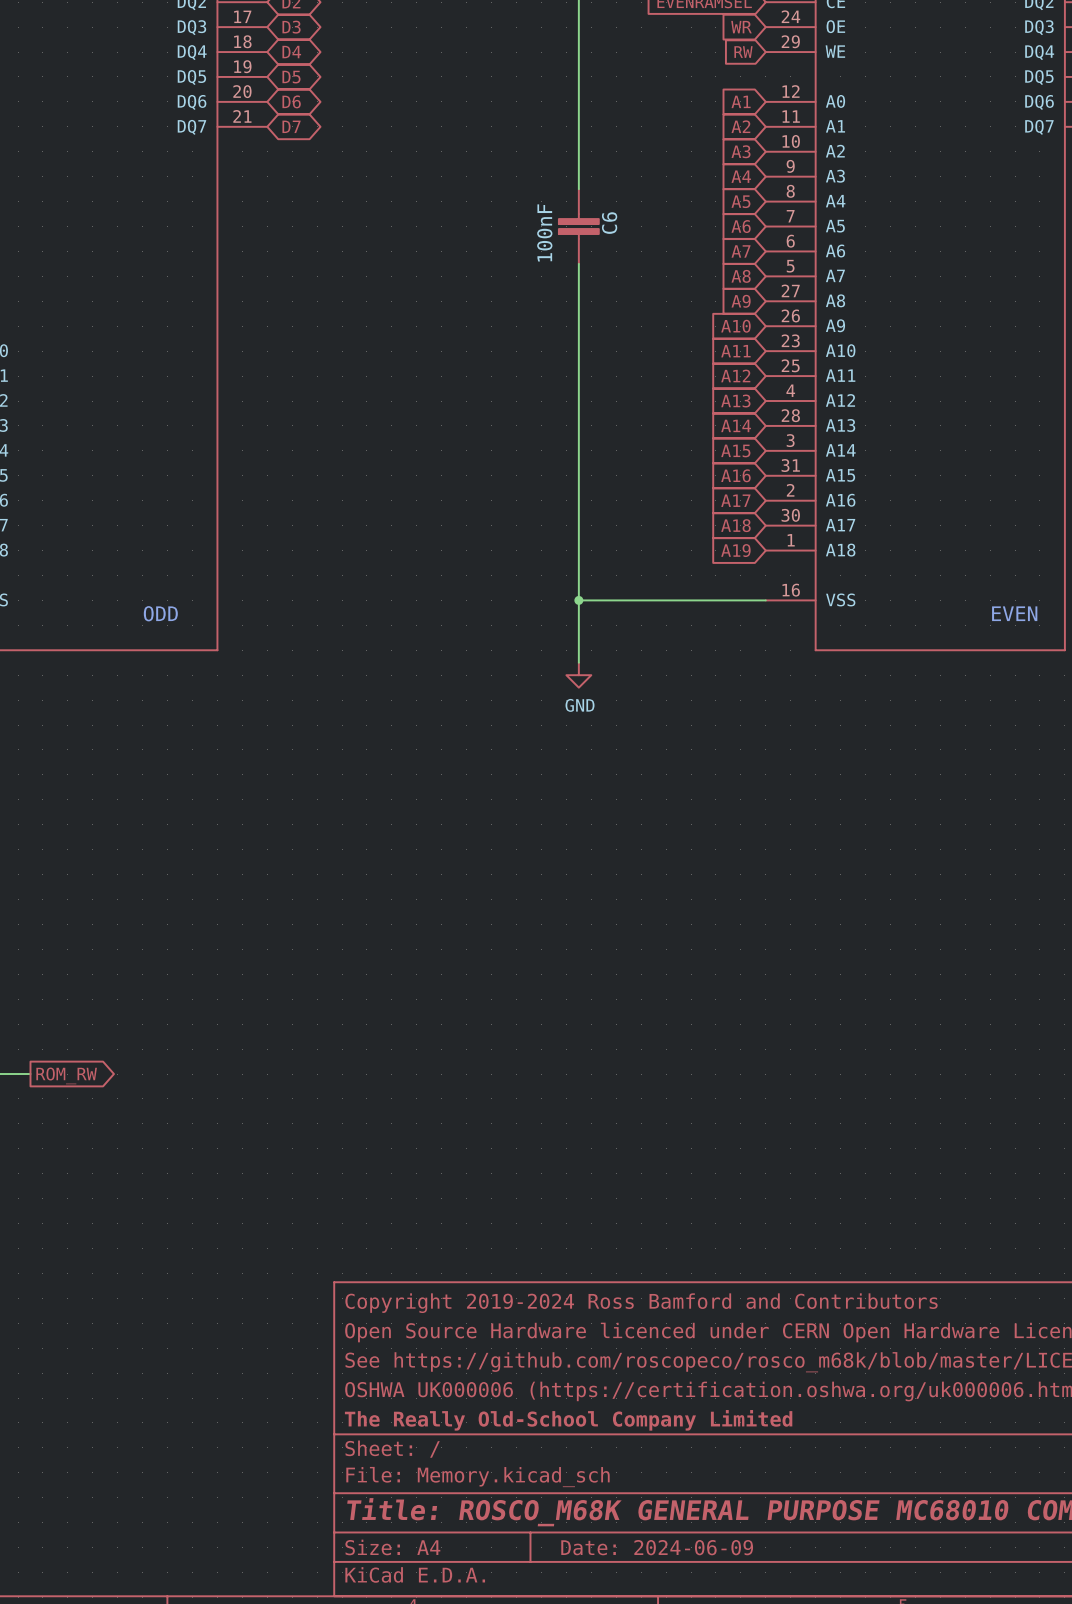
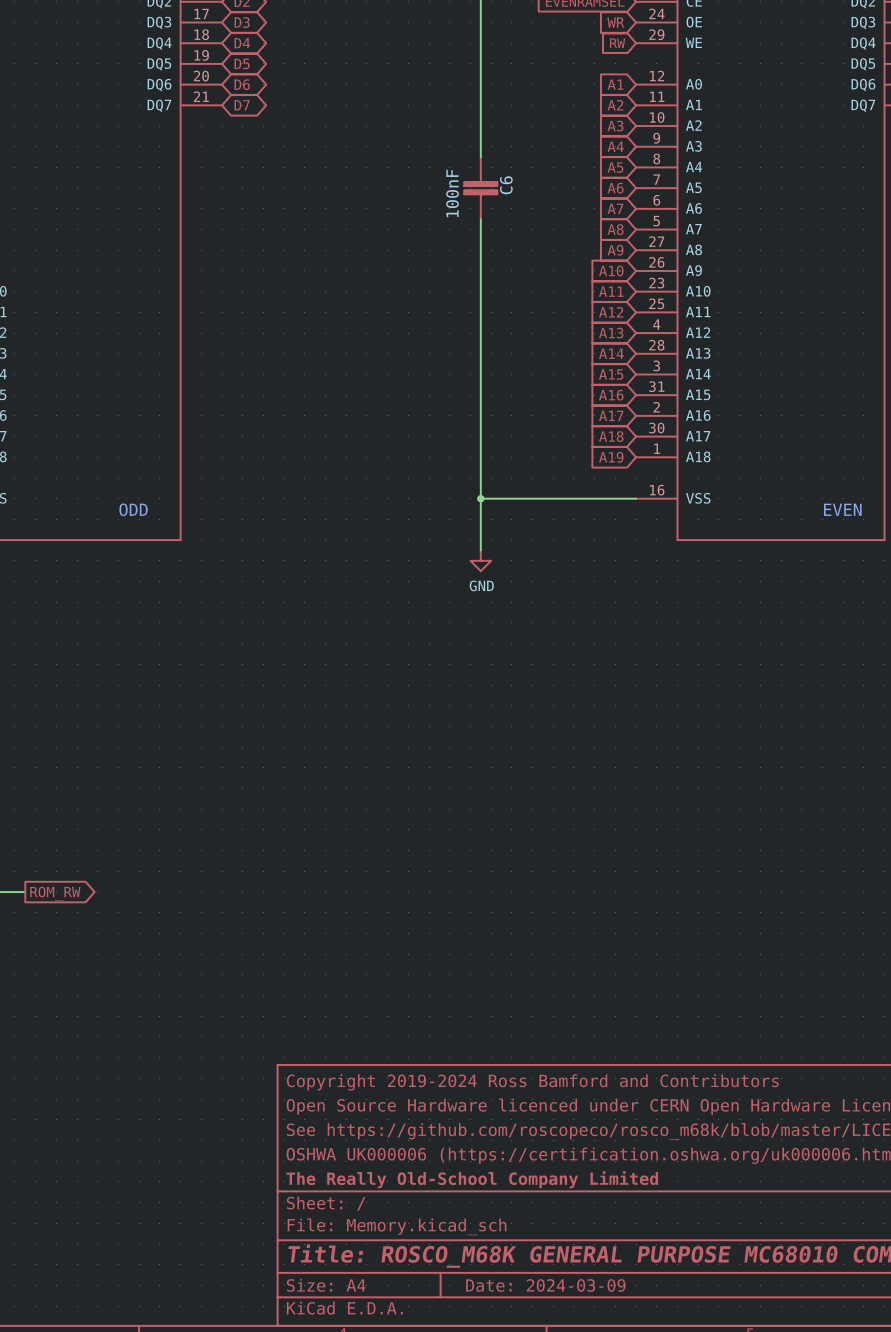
title block: Date: 2024-06-09 (657, 1547) -> Date: 2024-03-09 (545, 1285)

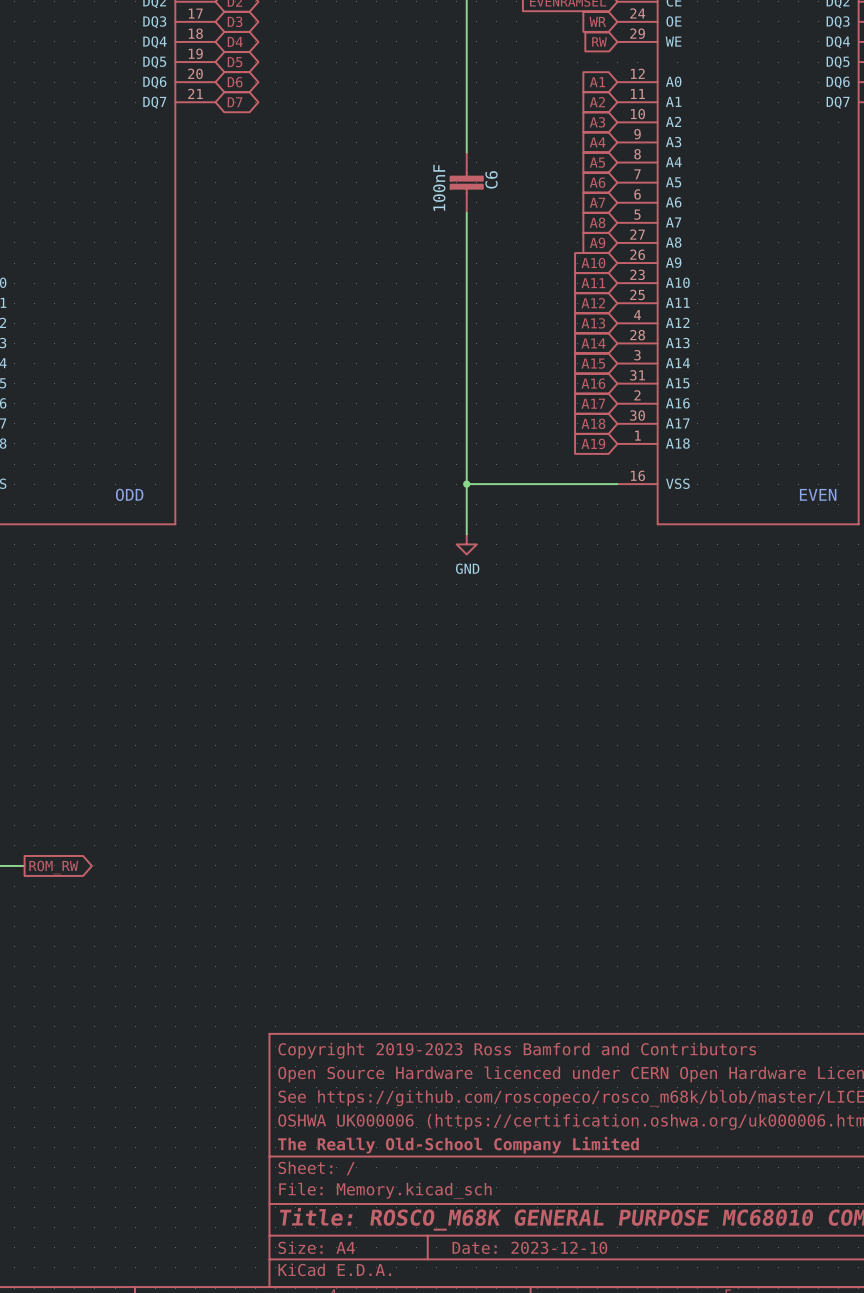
title block: Copyright 2019-2024 Ross Bamford and Contributors (532, 1082) -> Copyright 2019-2023 Ross Bamford and Contributors (517, 1050)
title block: Date: 2024-03-09 (545, 1285) -> Date: 2023-12-10 (529, 1247)

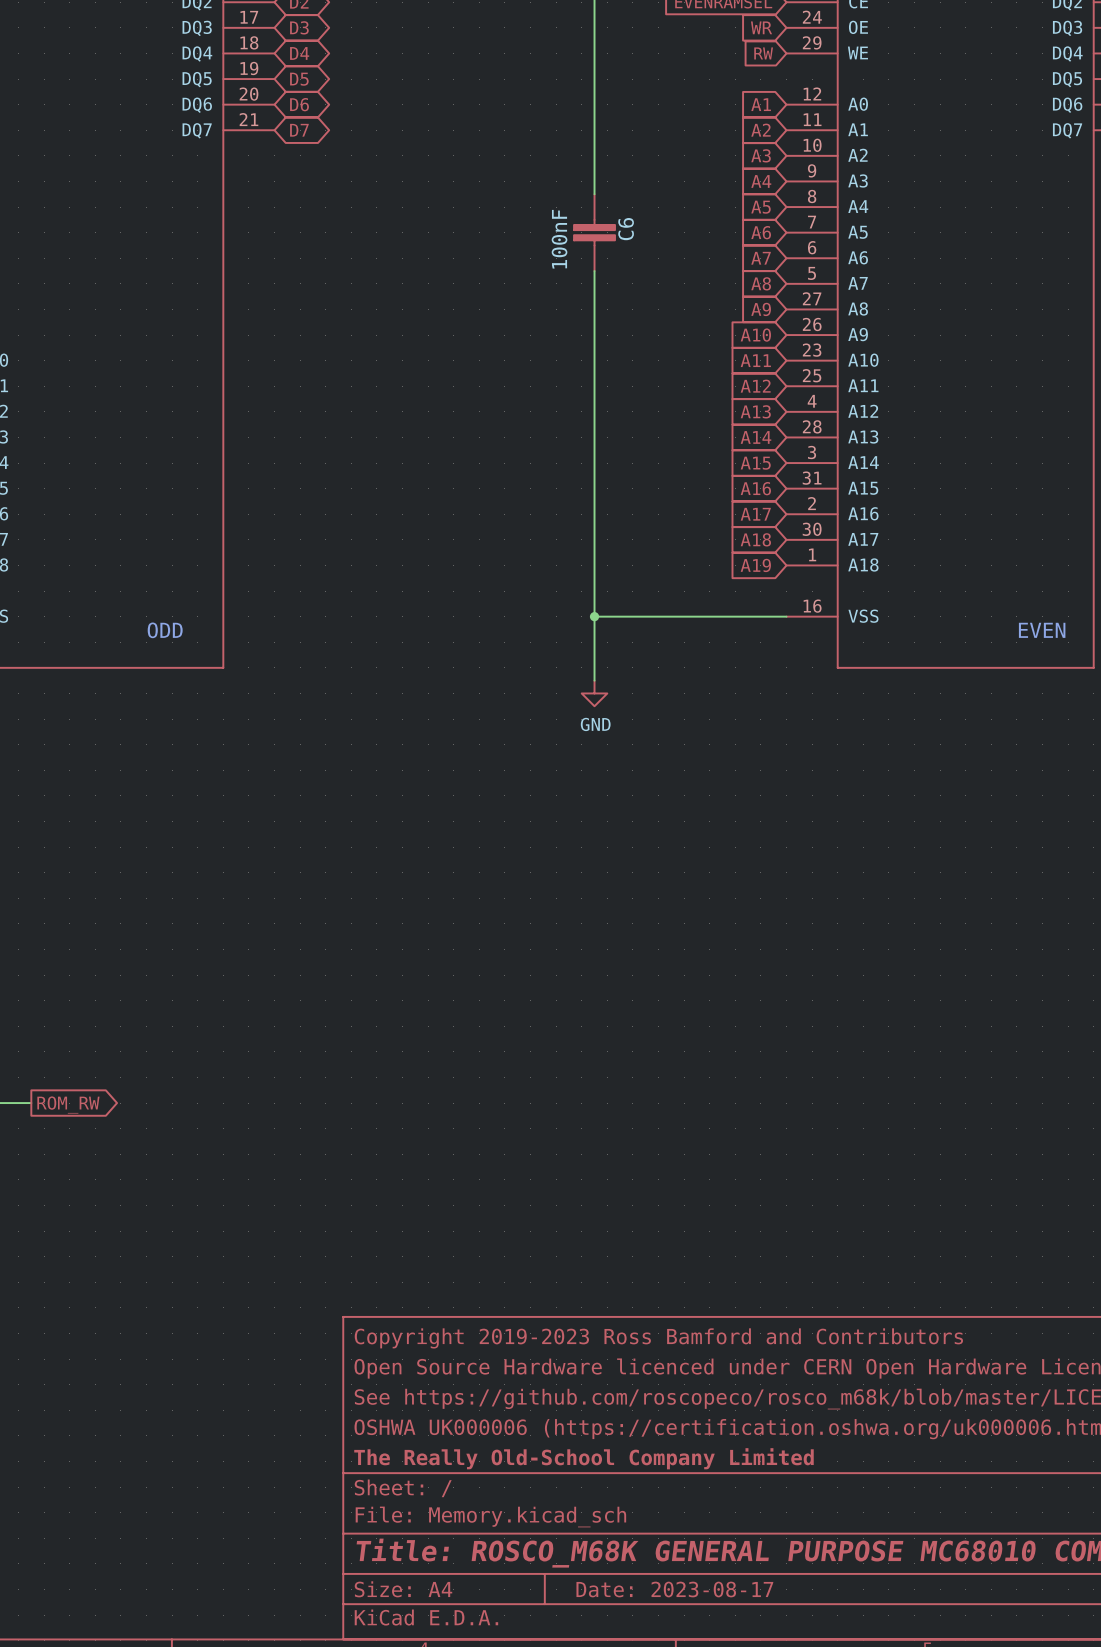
title block: Date: 2023-12-10 (529, 1247) -> Date: 2023-08-17 (674, 1589)

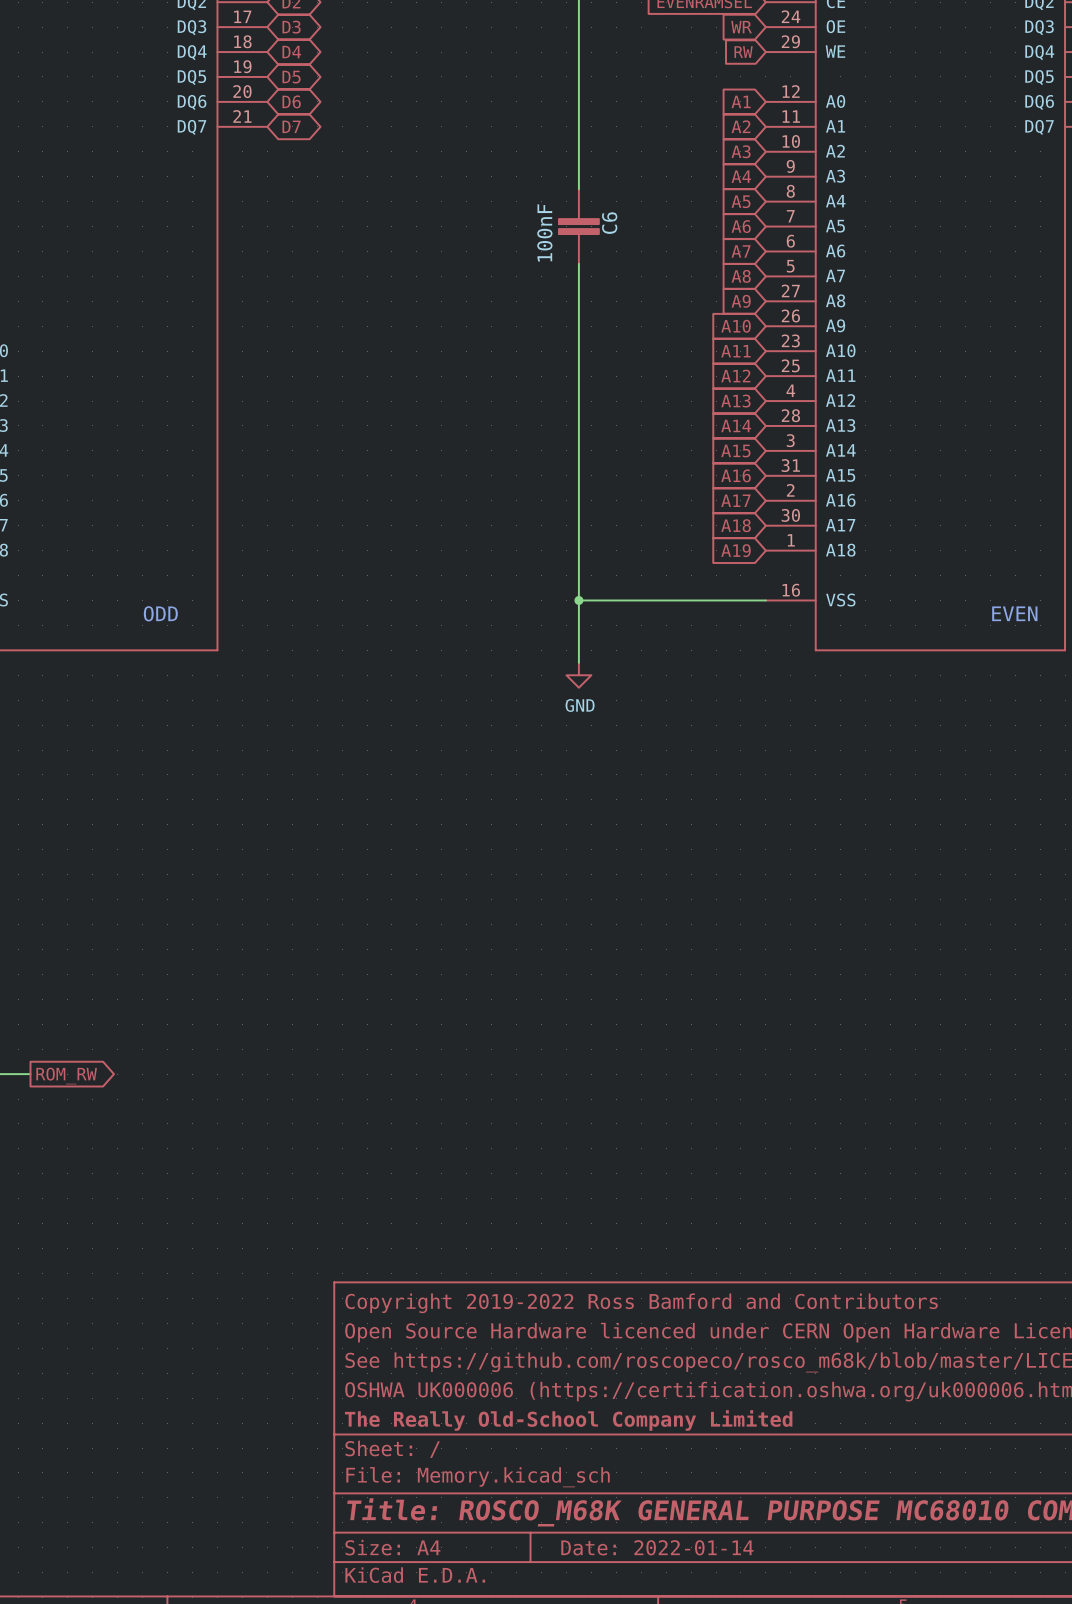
title block: Copyright 2019-2023 Ross Bamford and Contributors (658, 1338) -> Copyright 2019-2022 Ross Bamford and Contributors (641, 1303)
title block: Date: 2023-08-17 (674, 1589) -> Date: 2022-01-14 (657, 1547)

